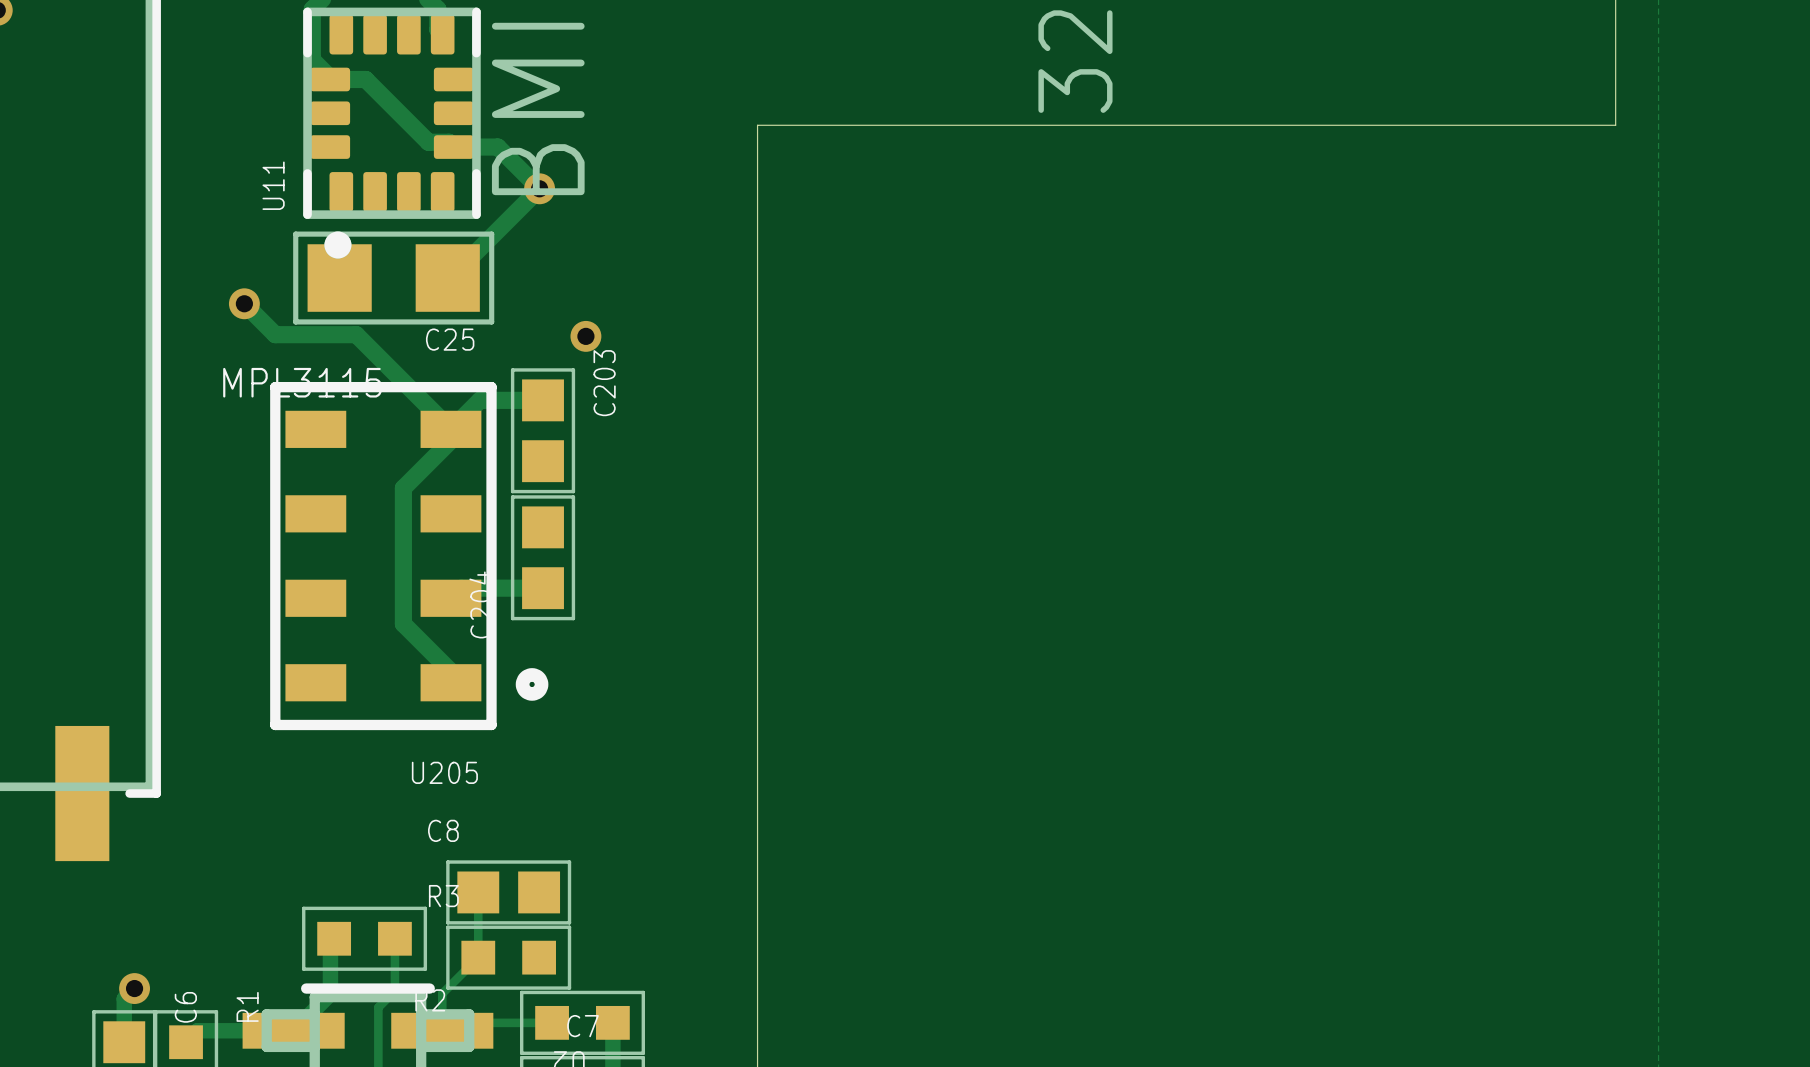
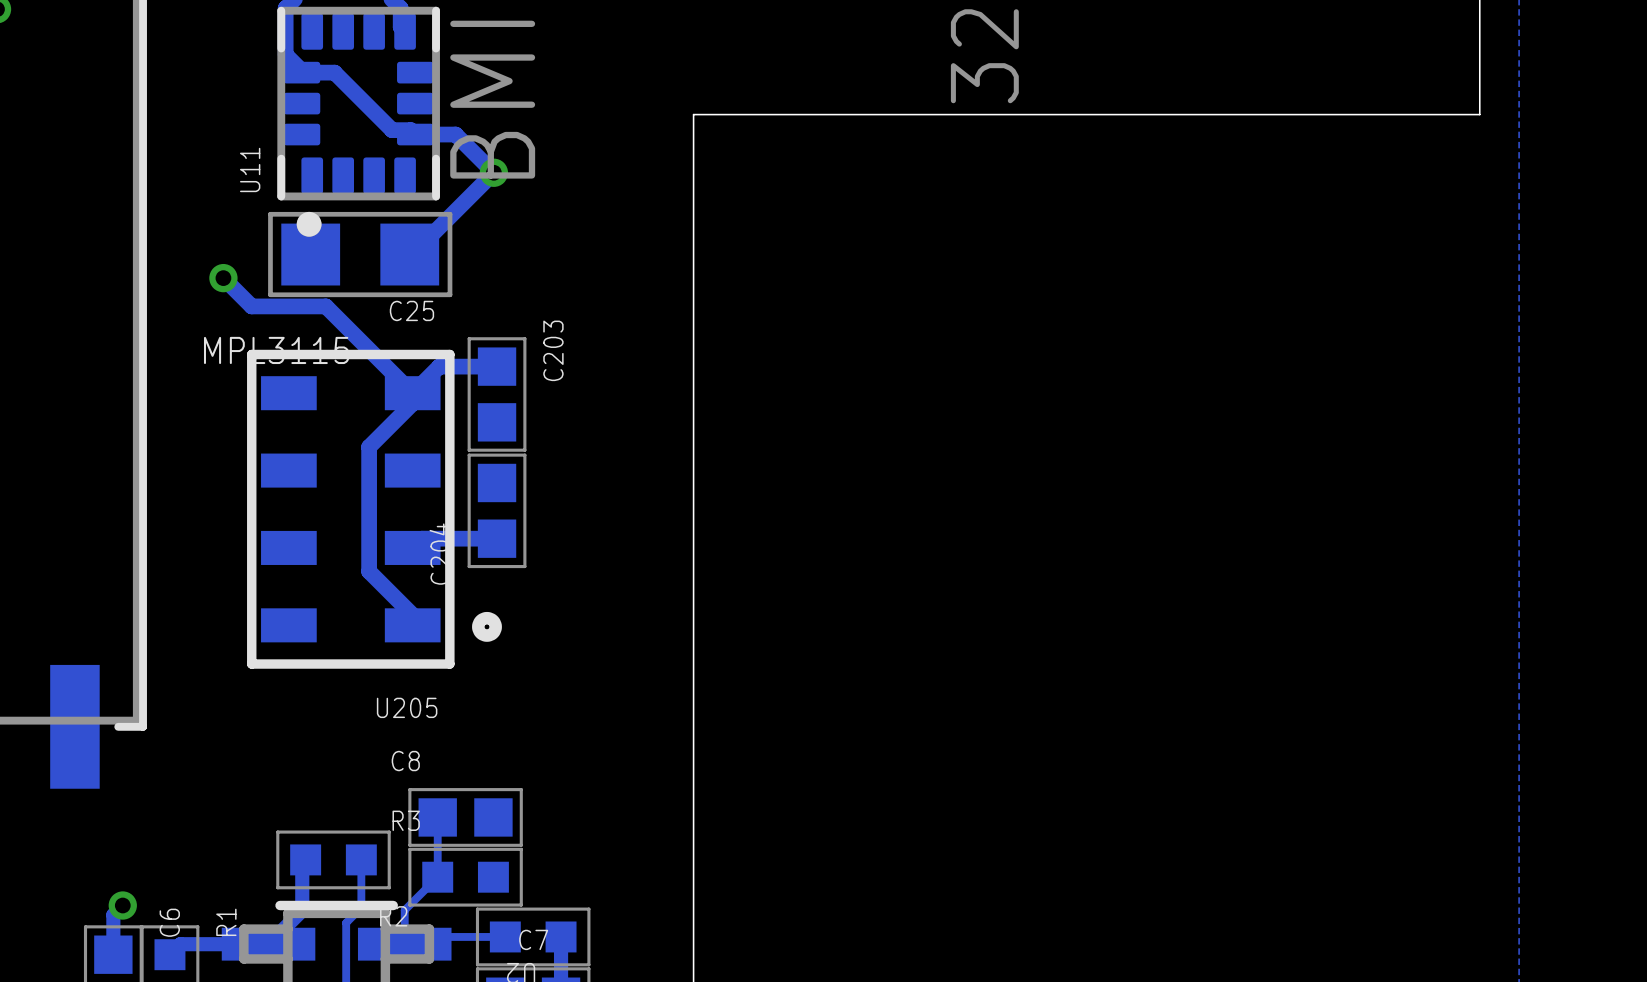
via: (585, 336) -> none

